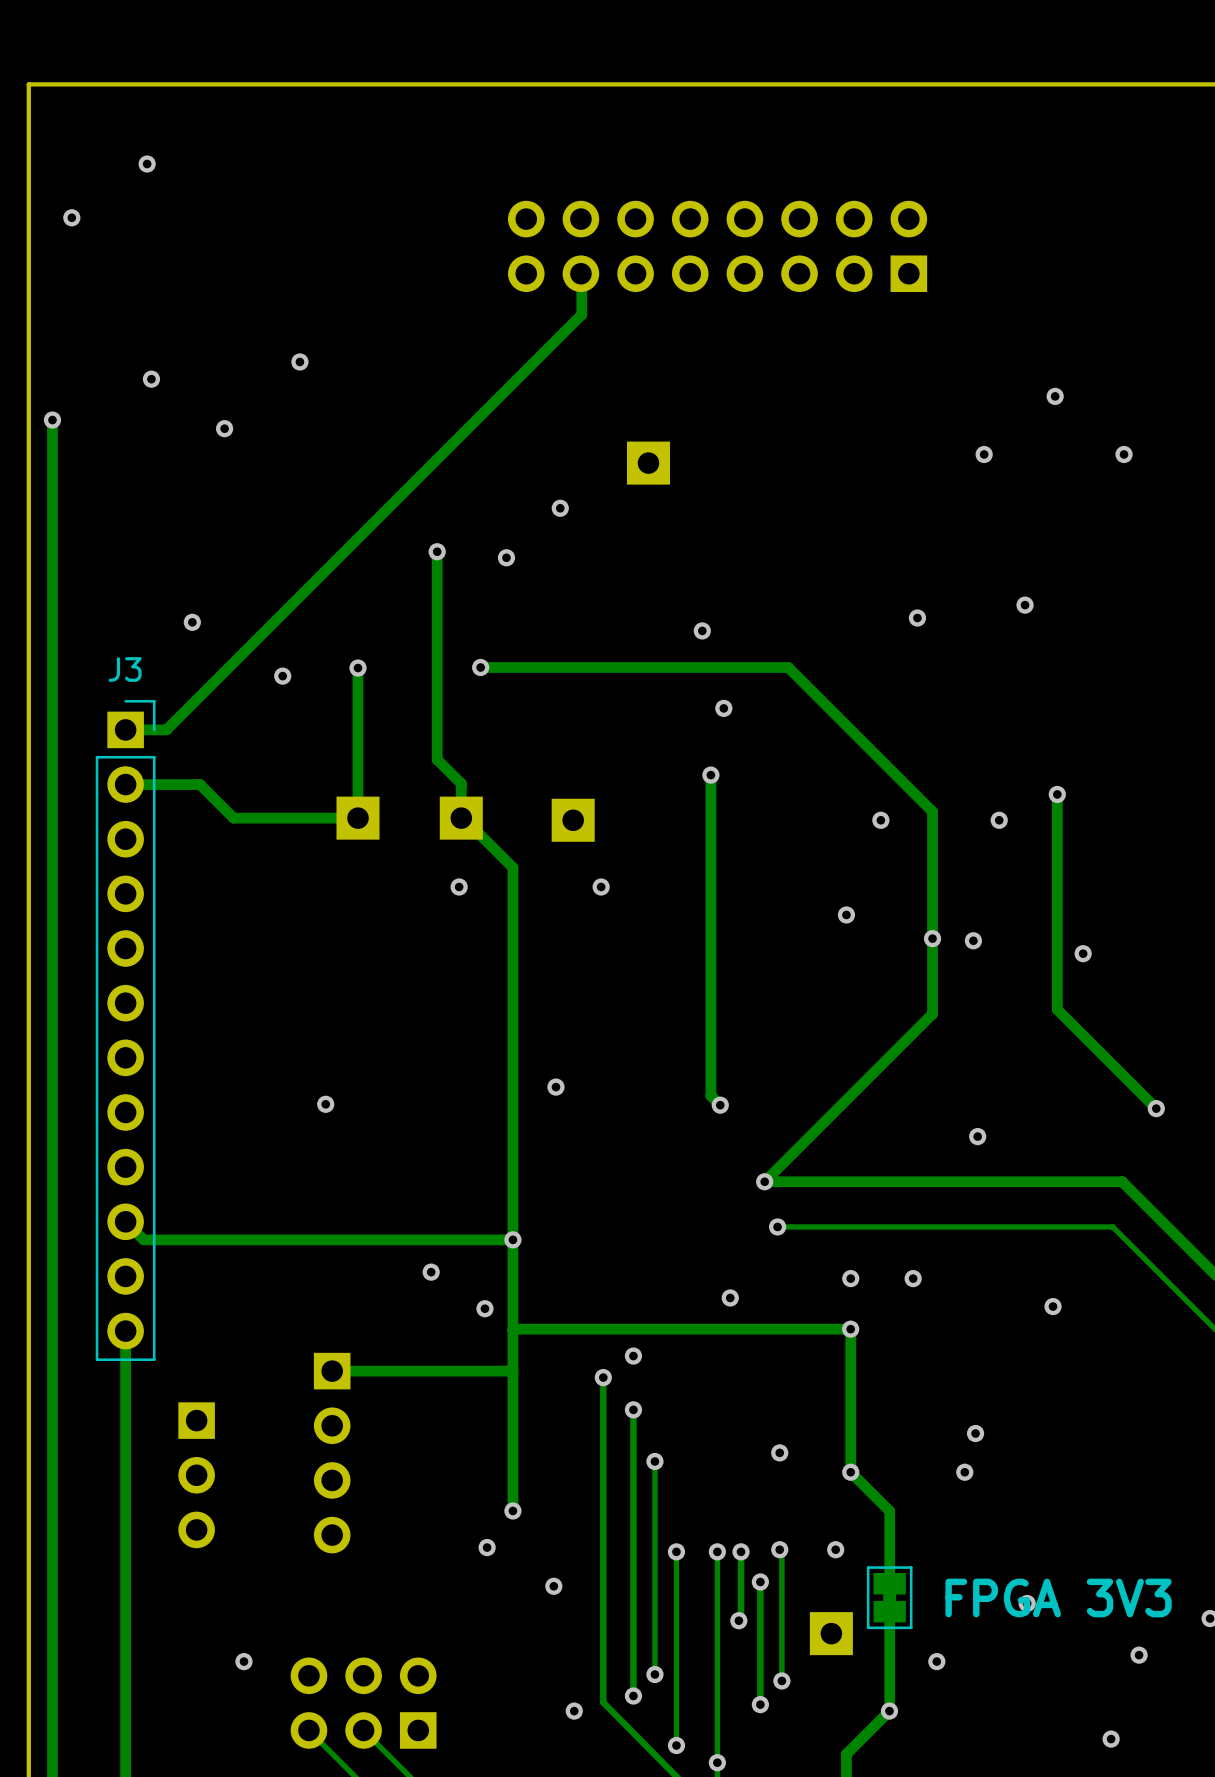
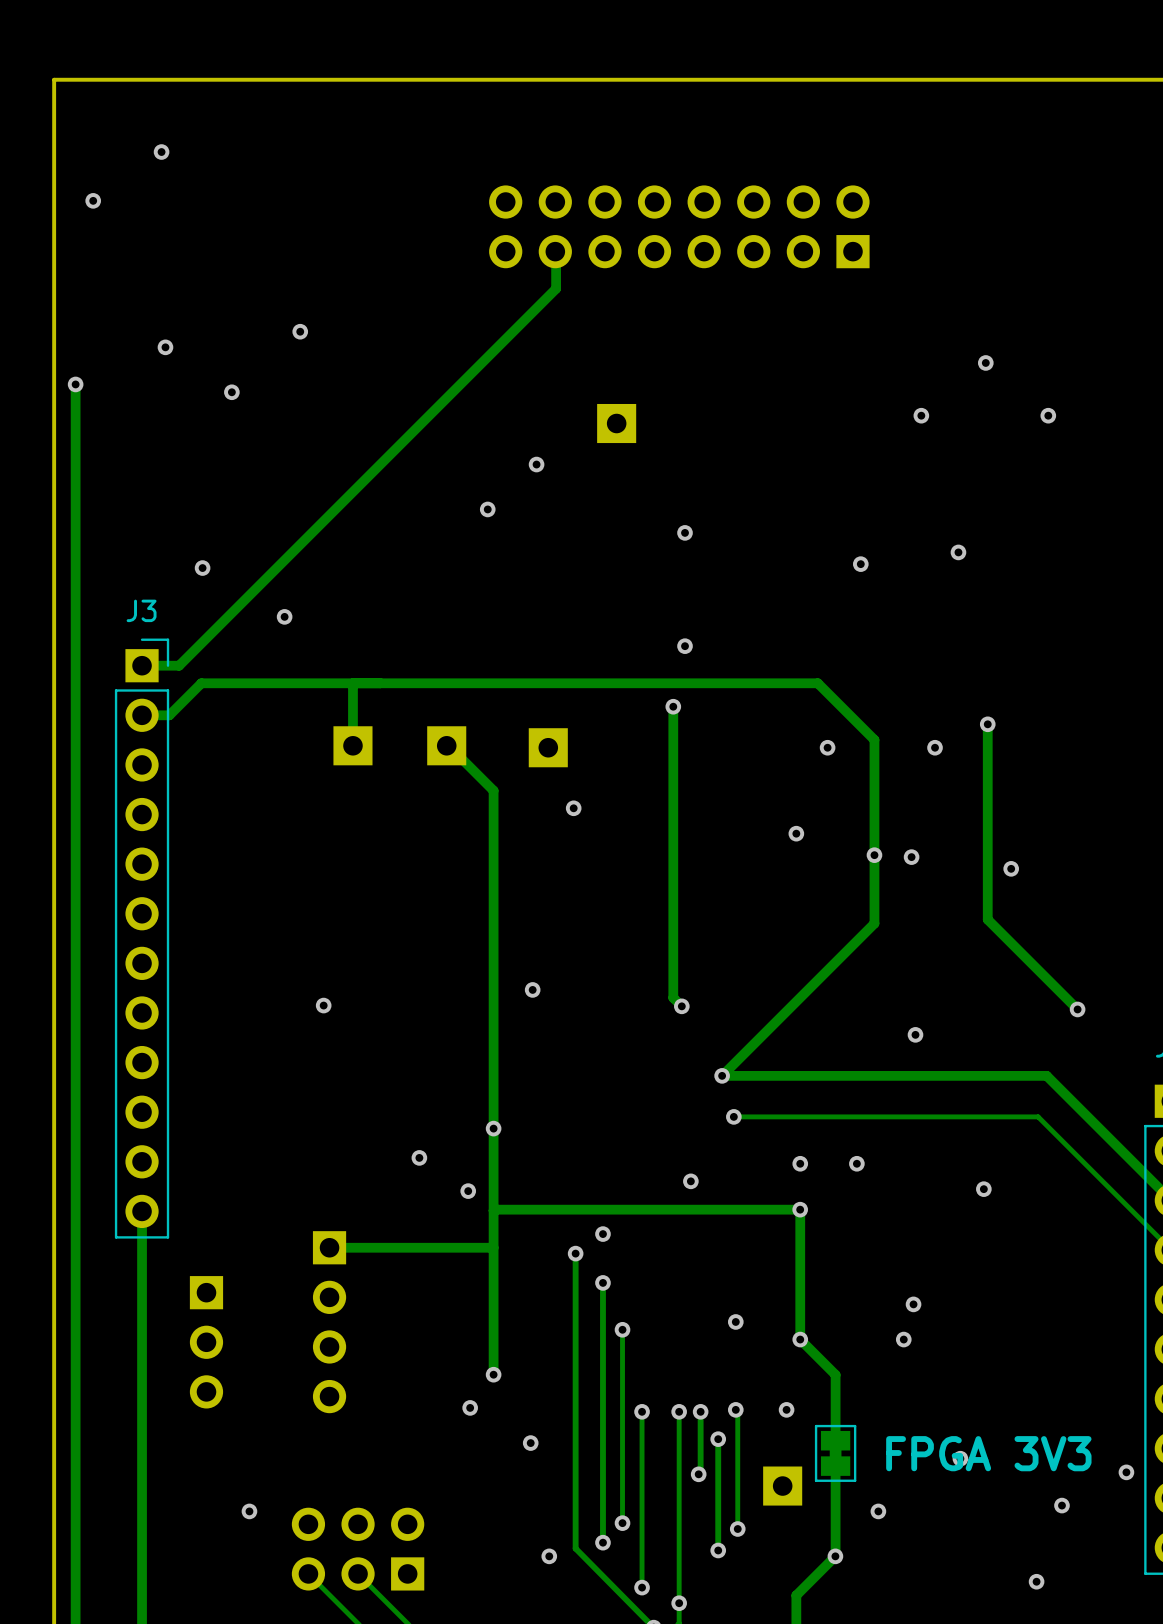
track: (437, 551) (437, 759) (461, 783) (461, 818) -> none
via: (437, 551) -> none
via position: (702, 630) -> (685, 532)
track: (480, 667) (788, 667) (870, 749) -> (169, 715) (201, 683) (817, 683)
via: (480, 667) -> none
track: (358, 668) (358, 749) -> none
via: (358, 668) -> none
track: (155, 784) (200, 784) (233, 818) (358, 818) -> none
via: (459, 886) -> none
track: (125, 1221) (143, 1239) (512, 1239) -> none

